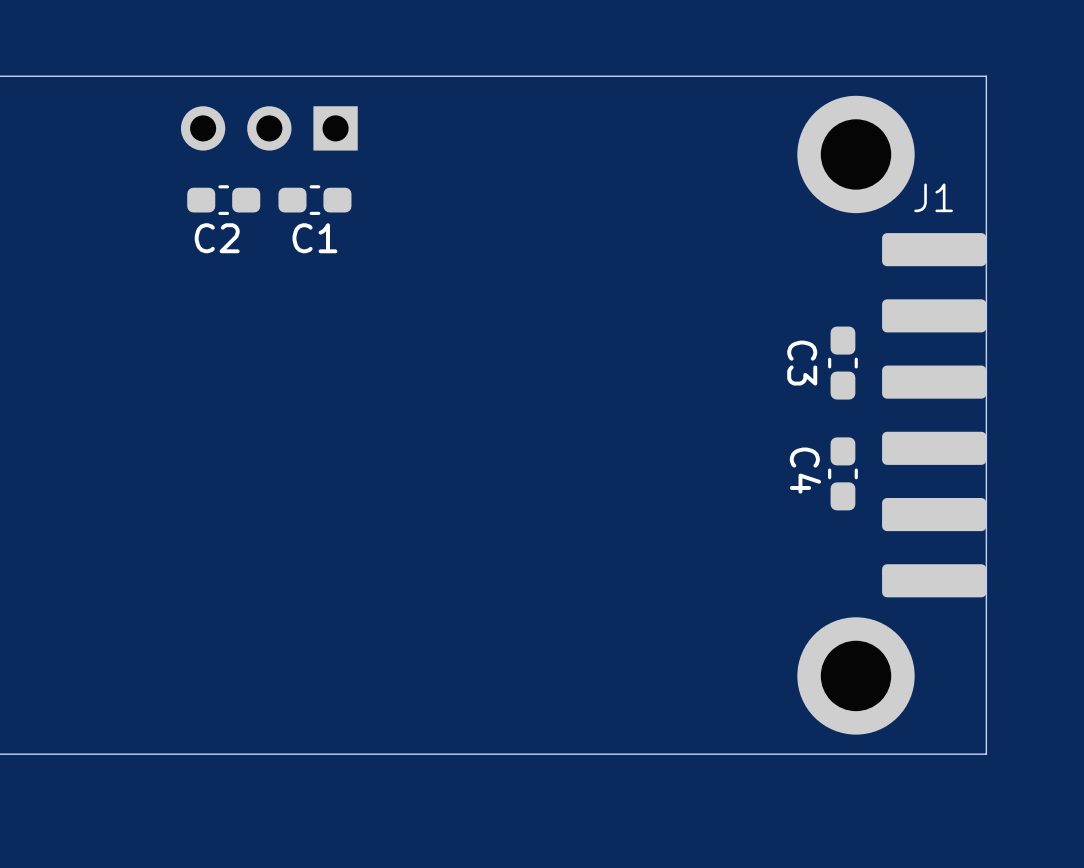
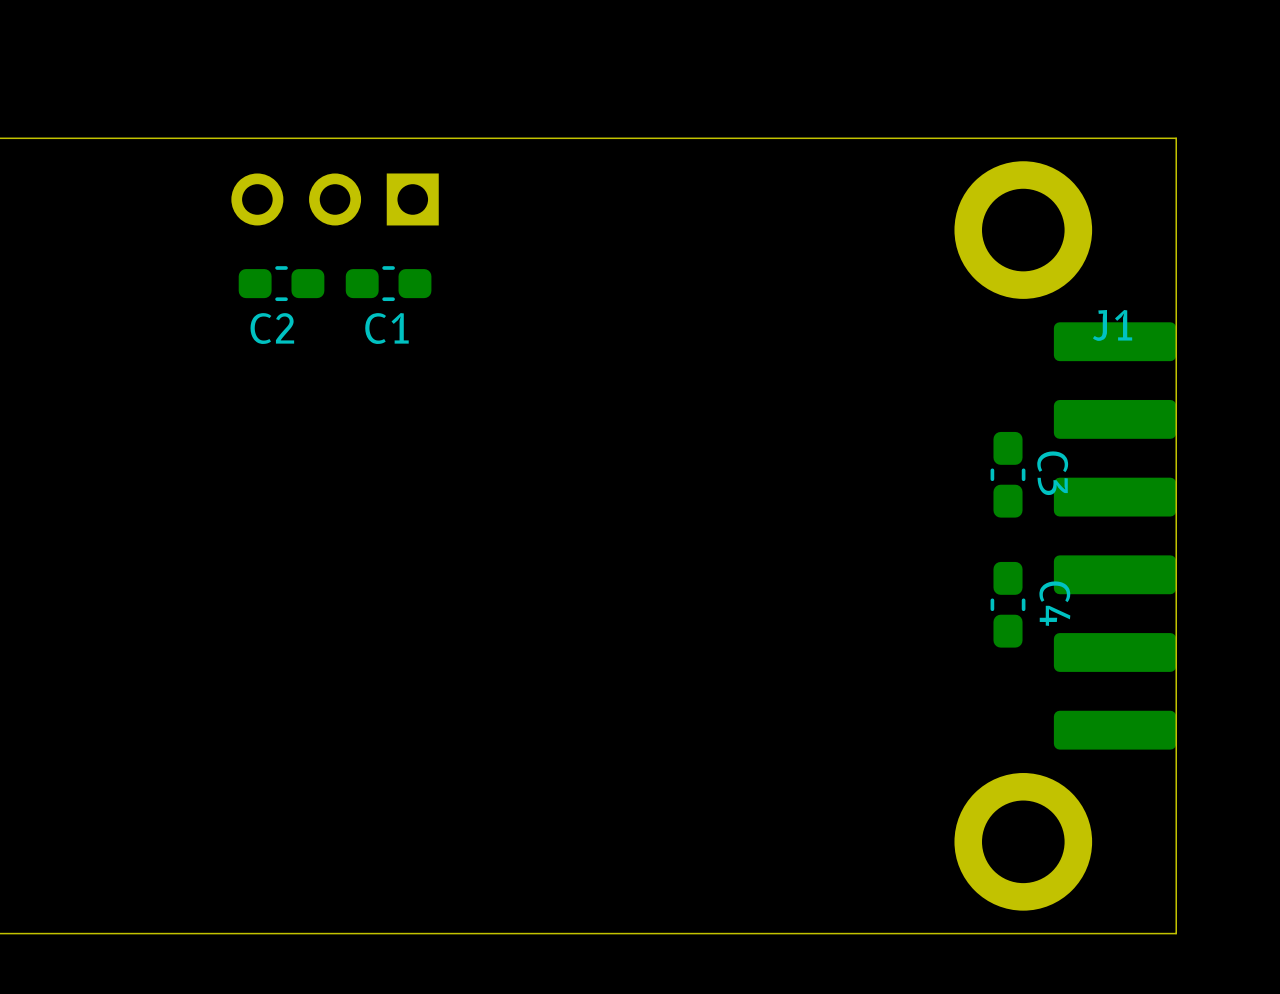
J1 name position: J1 (933, 197) -> J1 (1112, 325)
C3 name position: C3 (802, 363) -> C3 (1052, 473)
C4 name position: C4 (805, 470) -> C4 (1054, 603)

